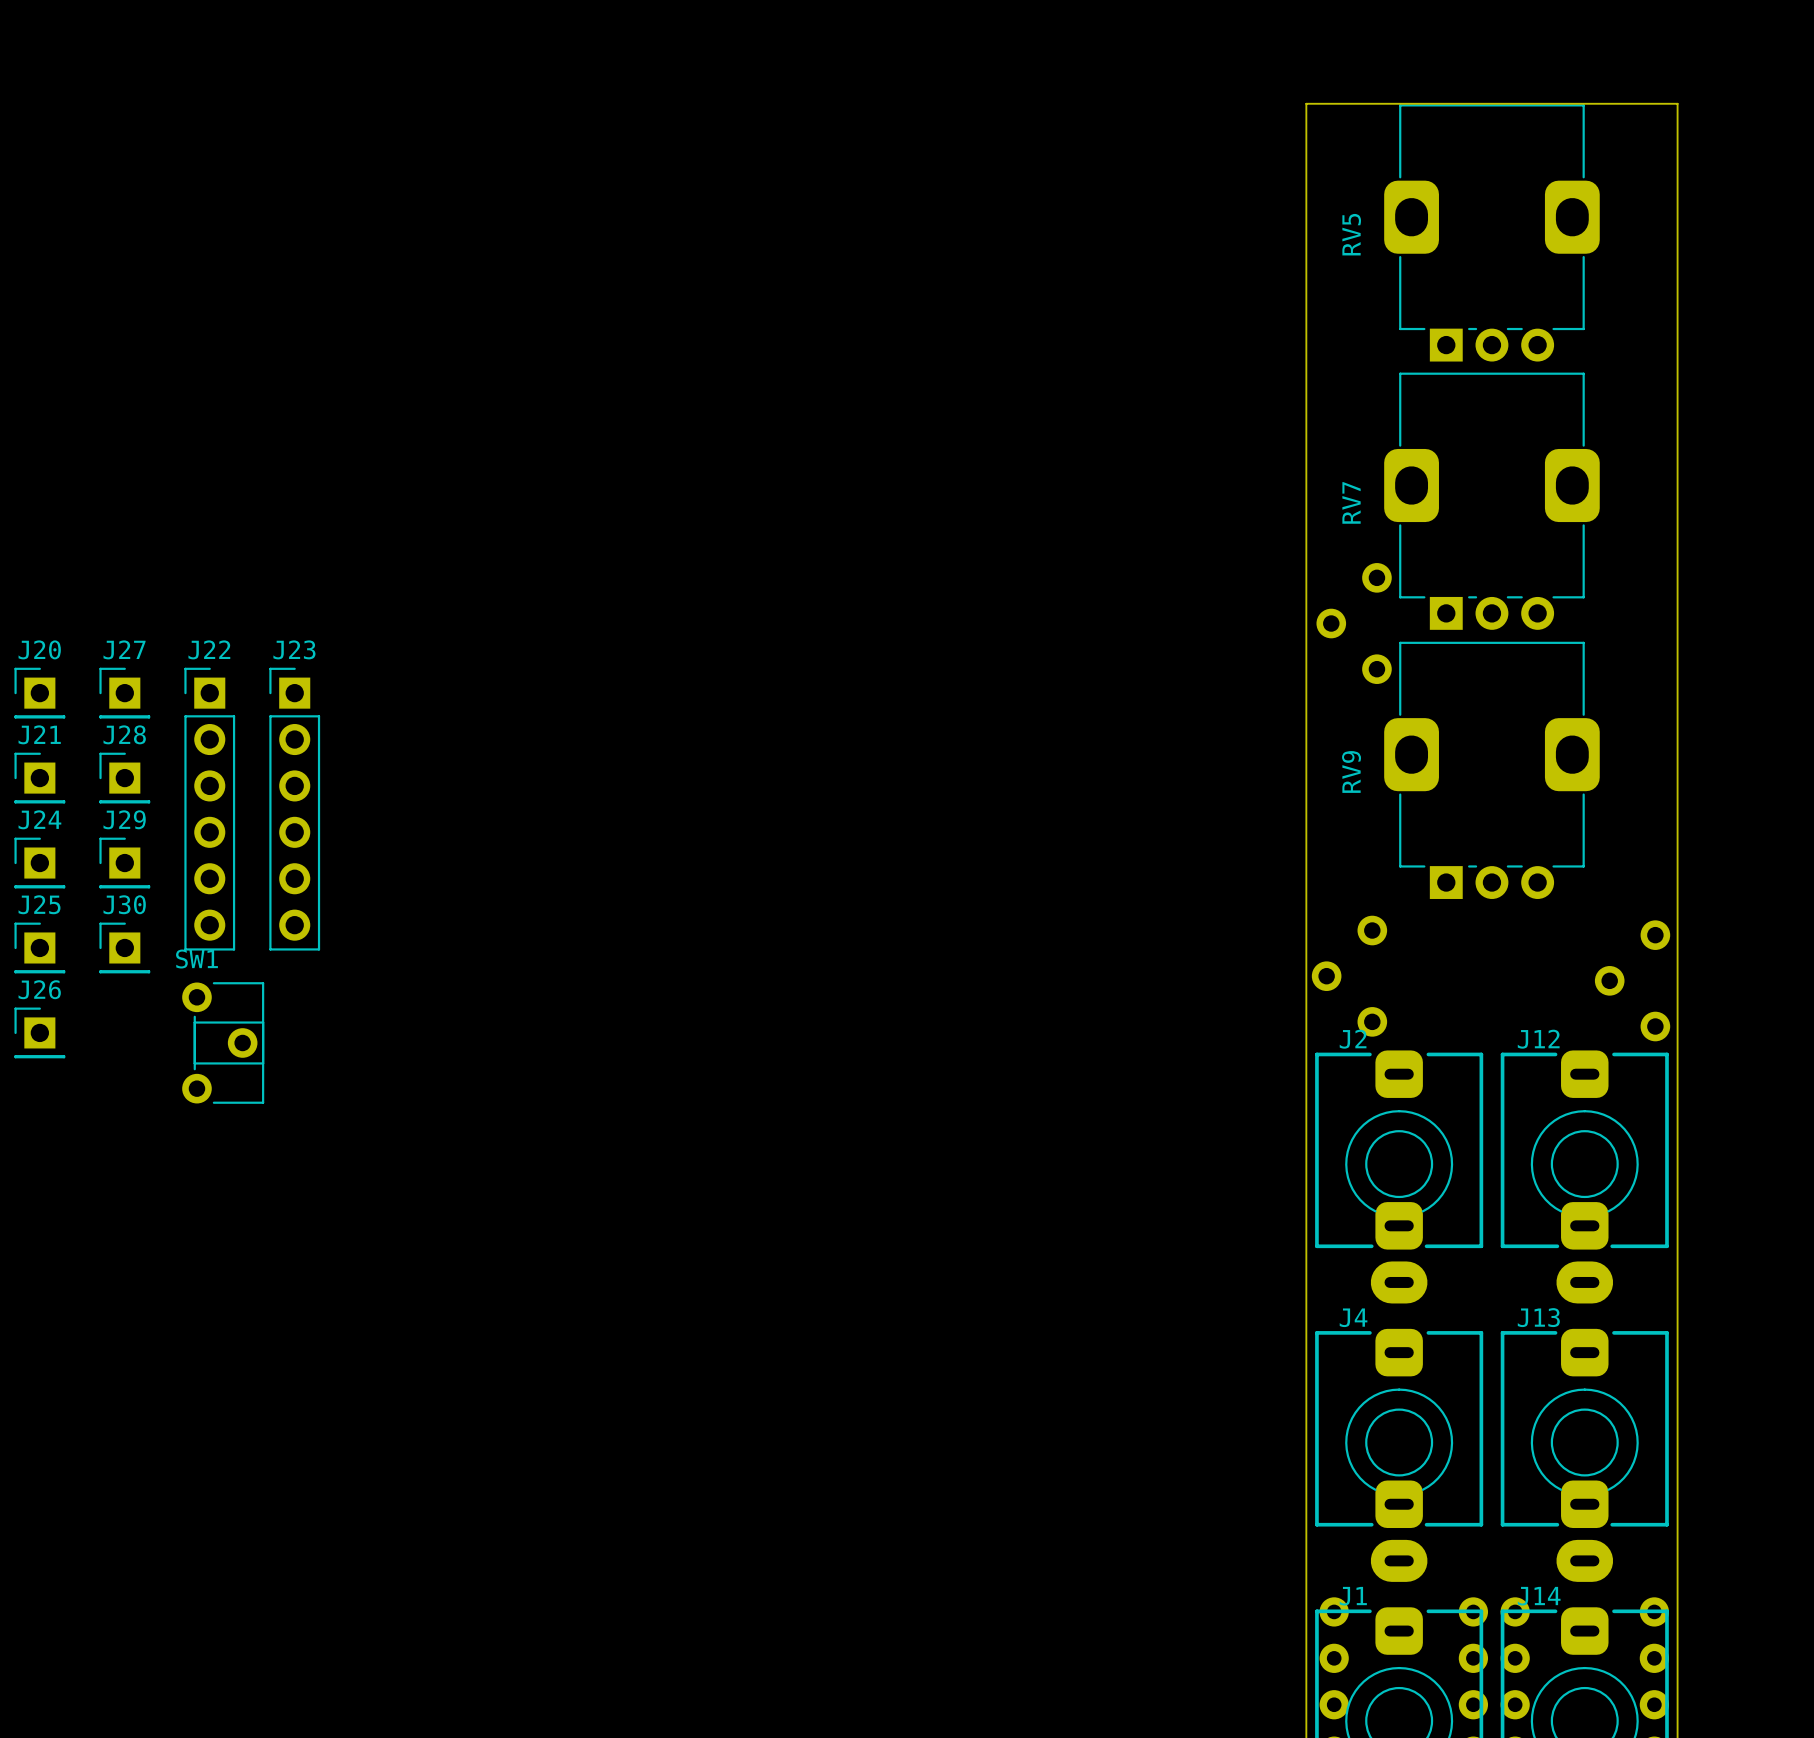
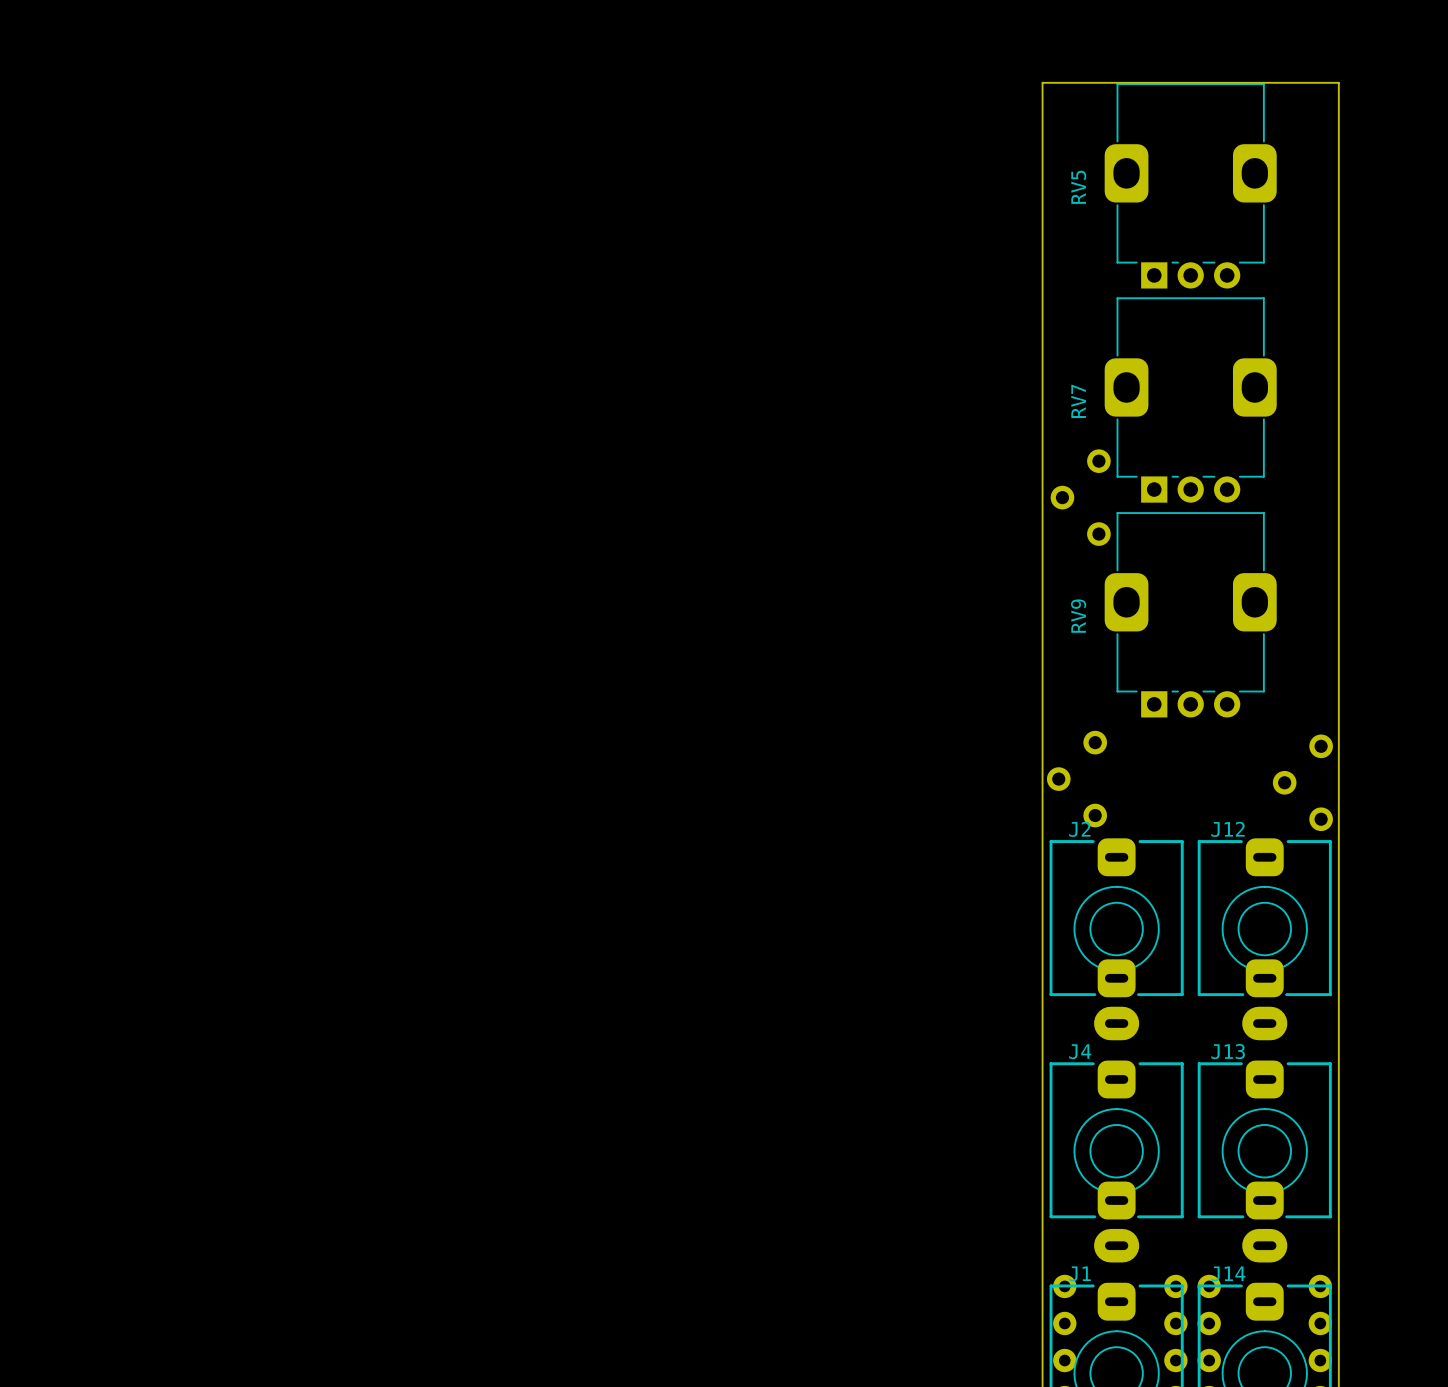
J20: (39, 693) -> none
J27: (124, 693) -> none
J21: (39, 778) -> none
J28: (124, 778) -> none
J22: (209, 809) -> none
J23: (294, 809) -> none
J24: (39, 863) -> none
J29: (124, 863) -> none
J25: (39, 947) -> none
J30: (124, 947) -> none
J26: (39, 1032) -> none
SW1: (223, 1042) -> none

